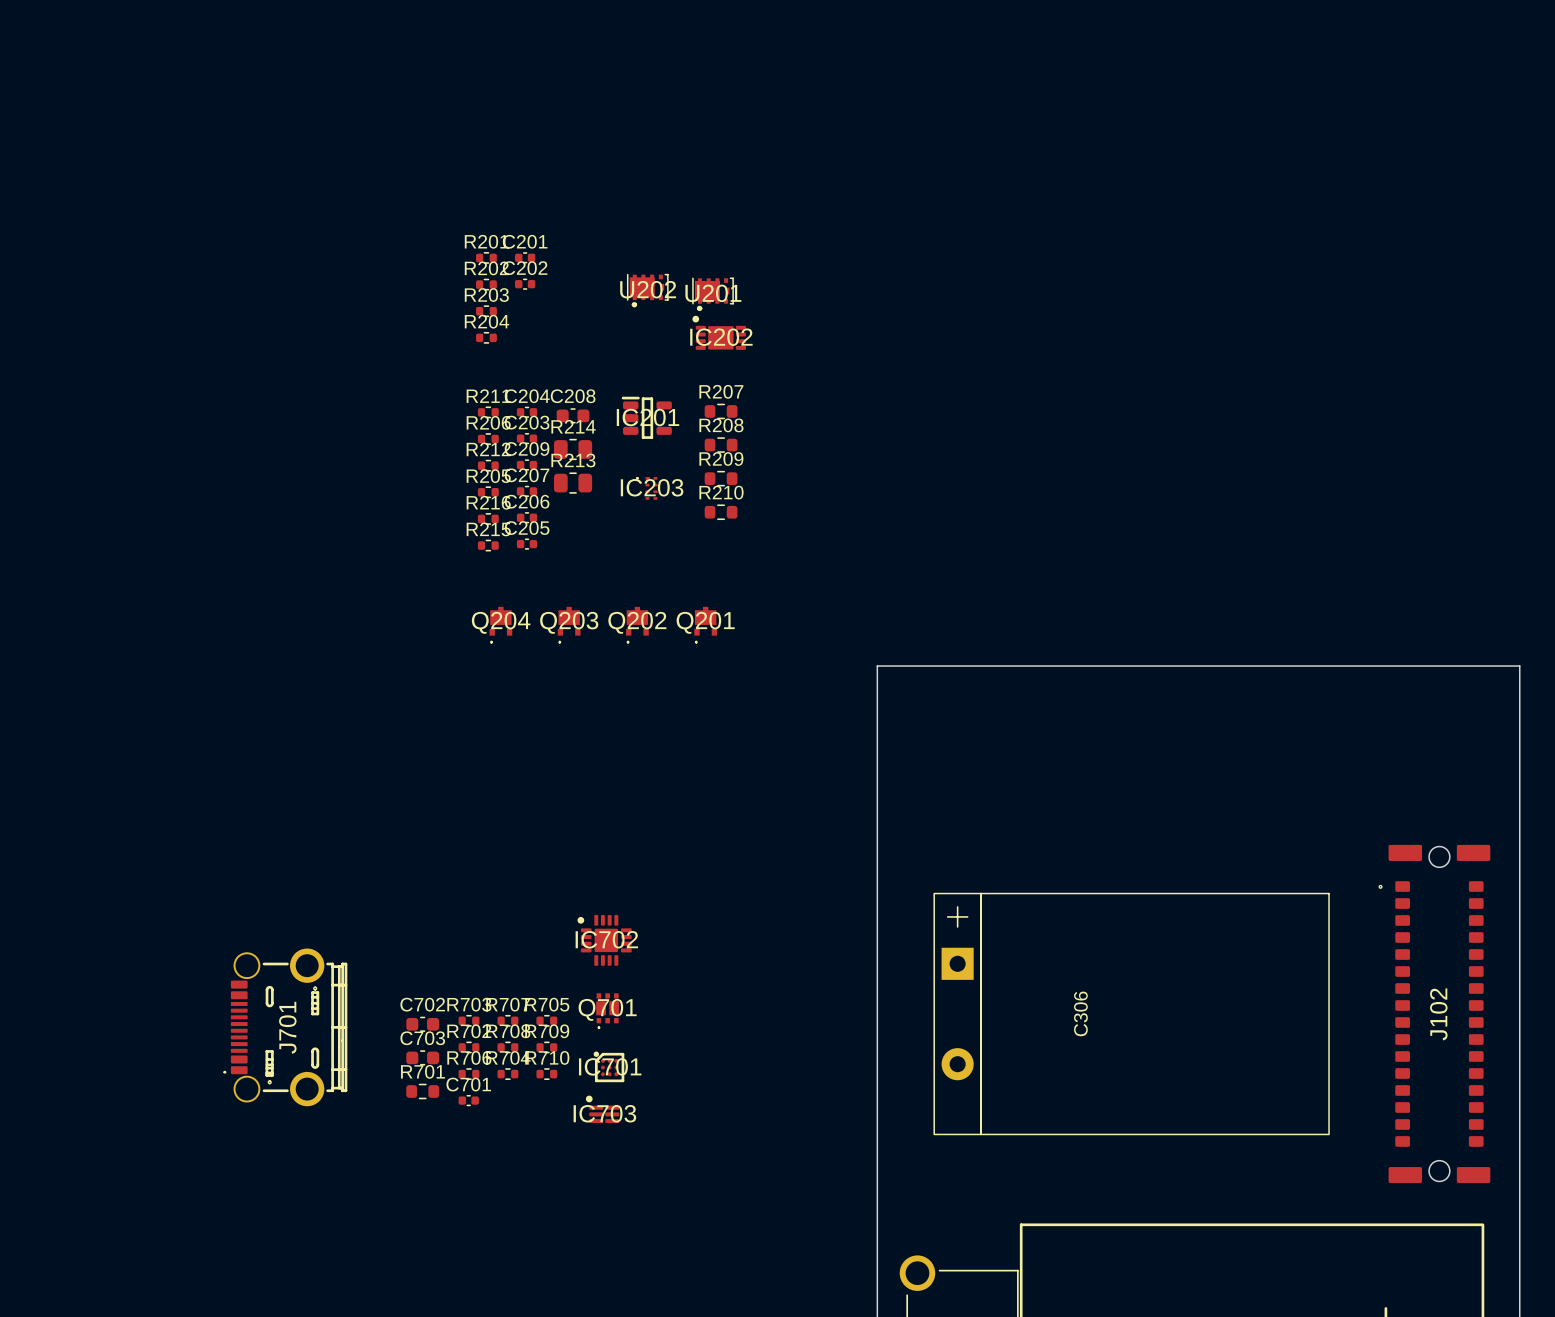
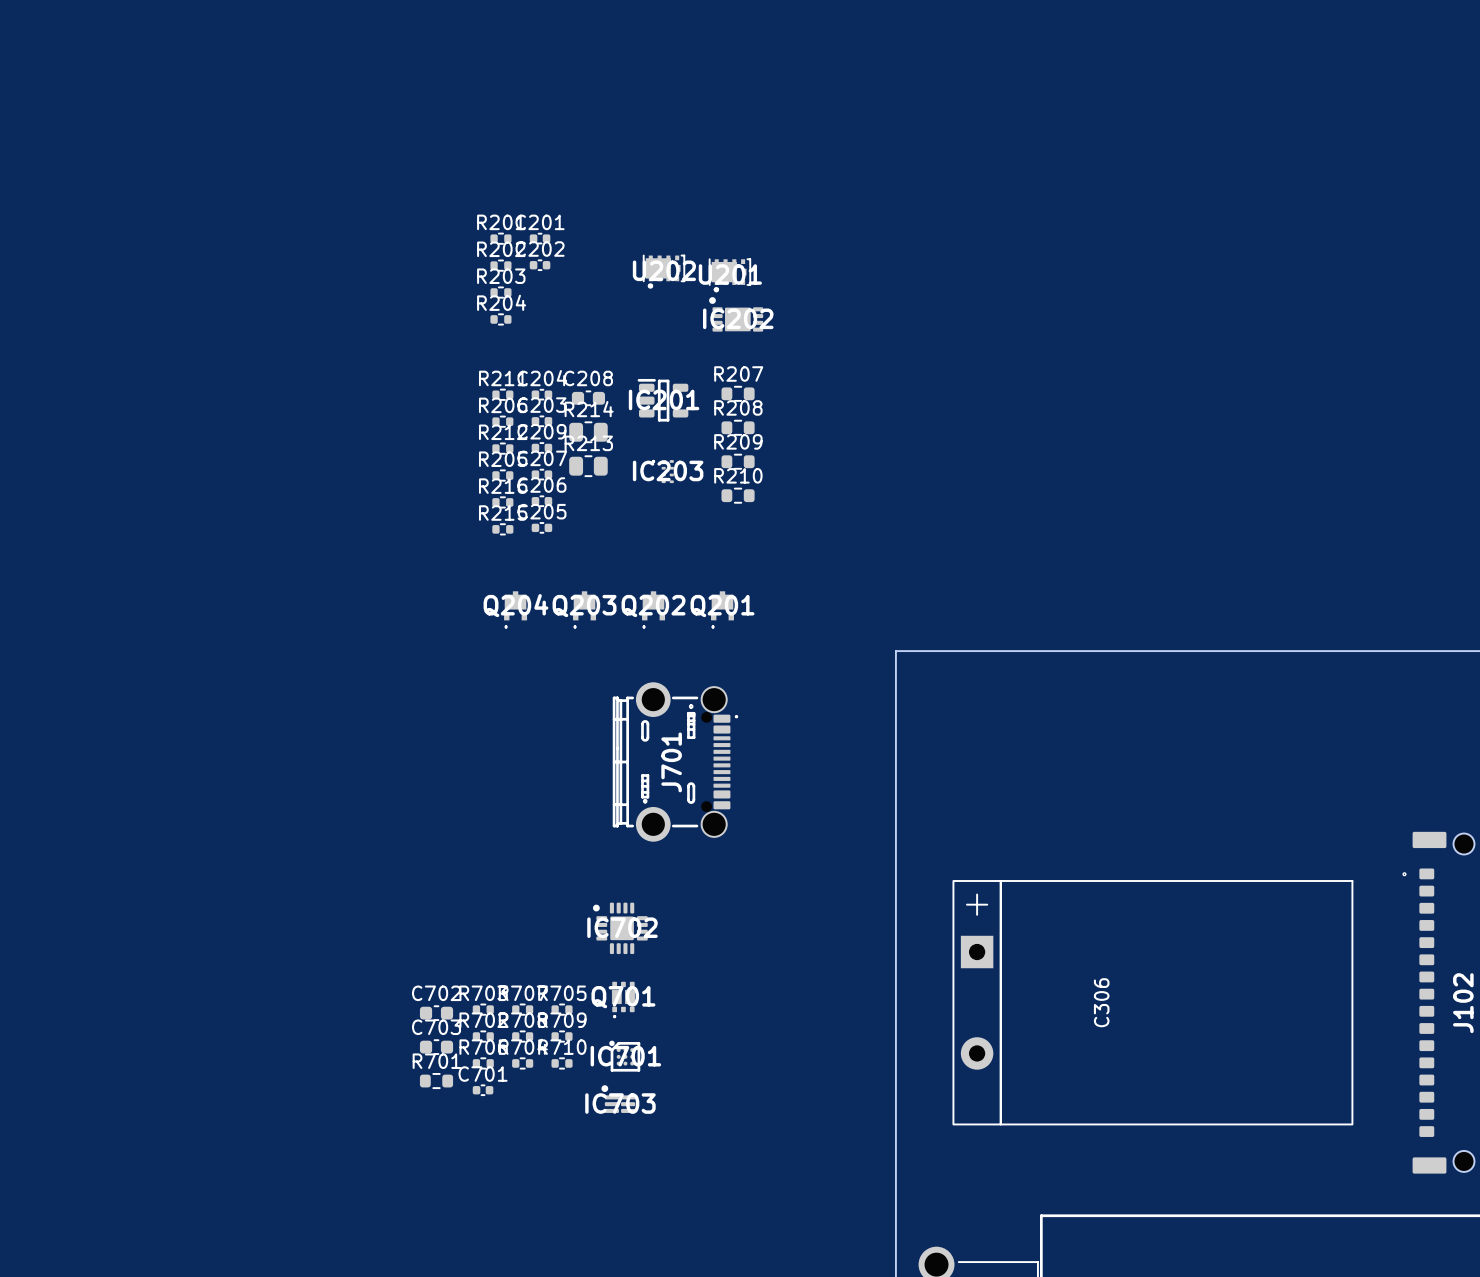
J701 rotation: 0° (285, 1027) -> 180° (675, 761)
J701 position: (285, 1027) -> (675, 761)

